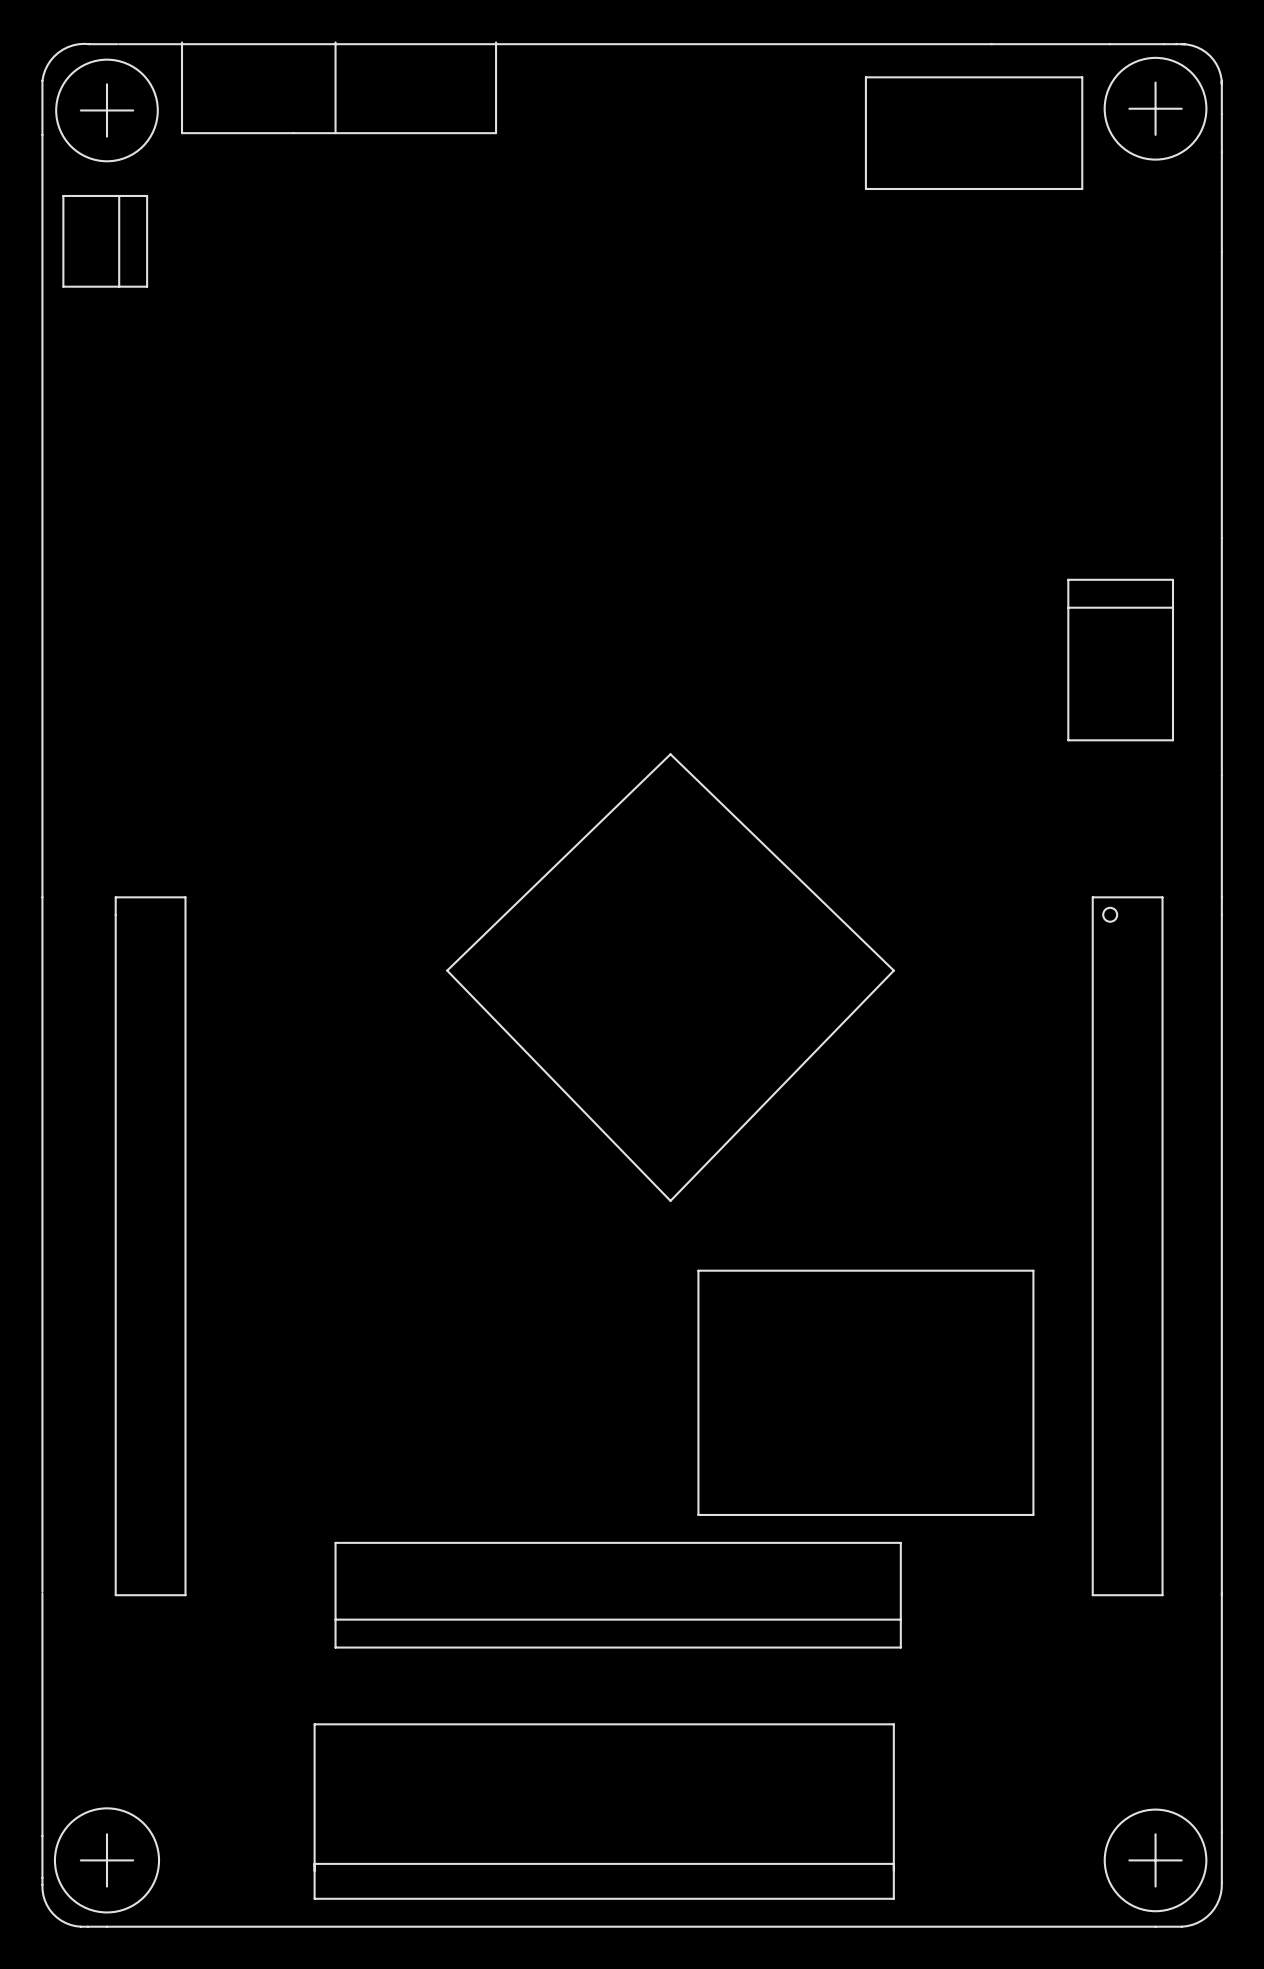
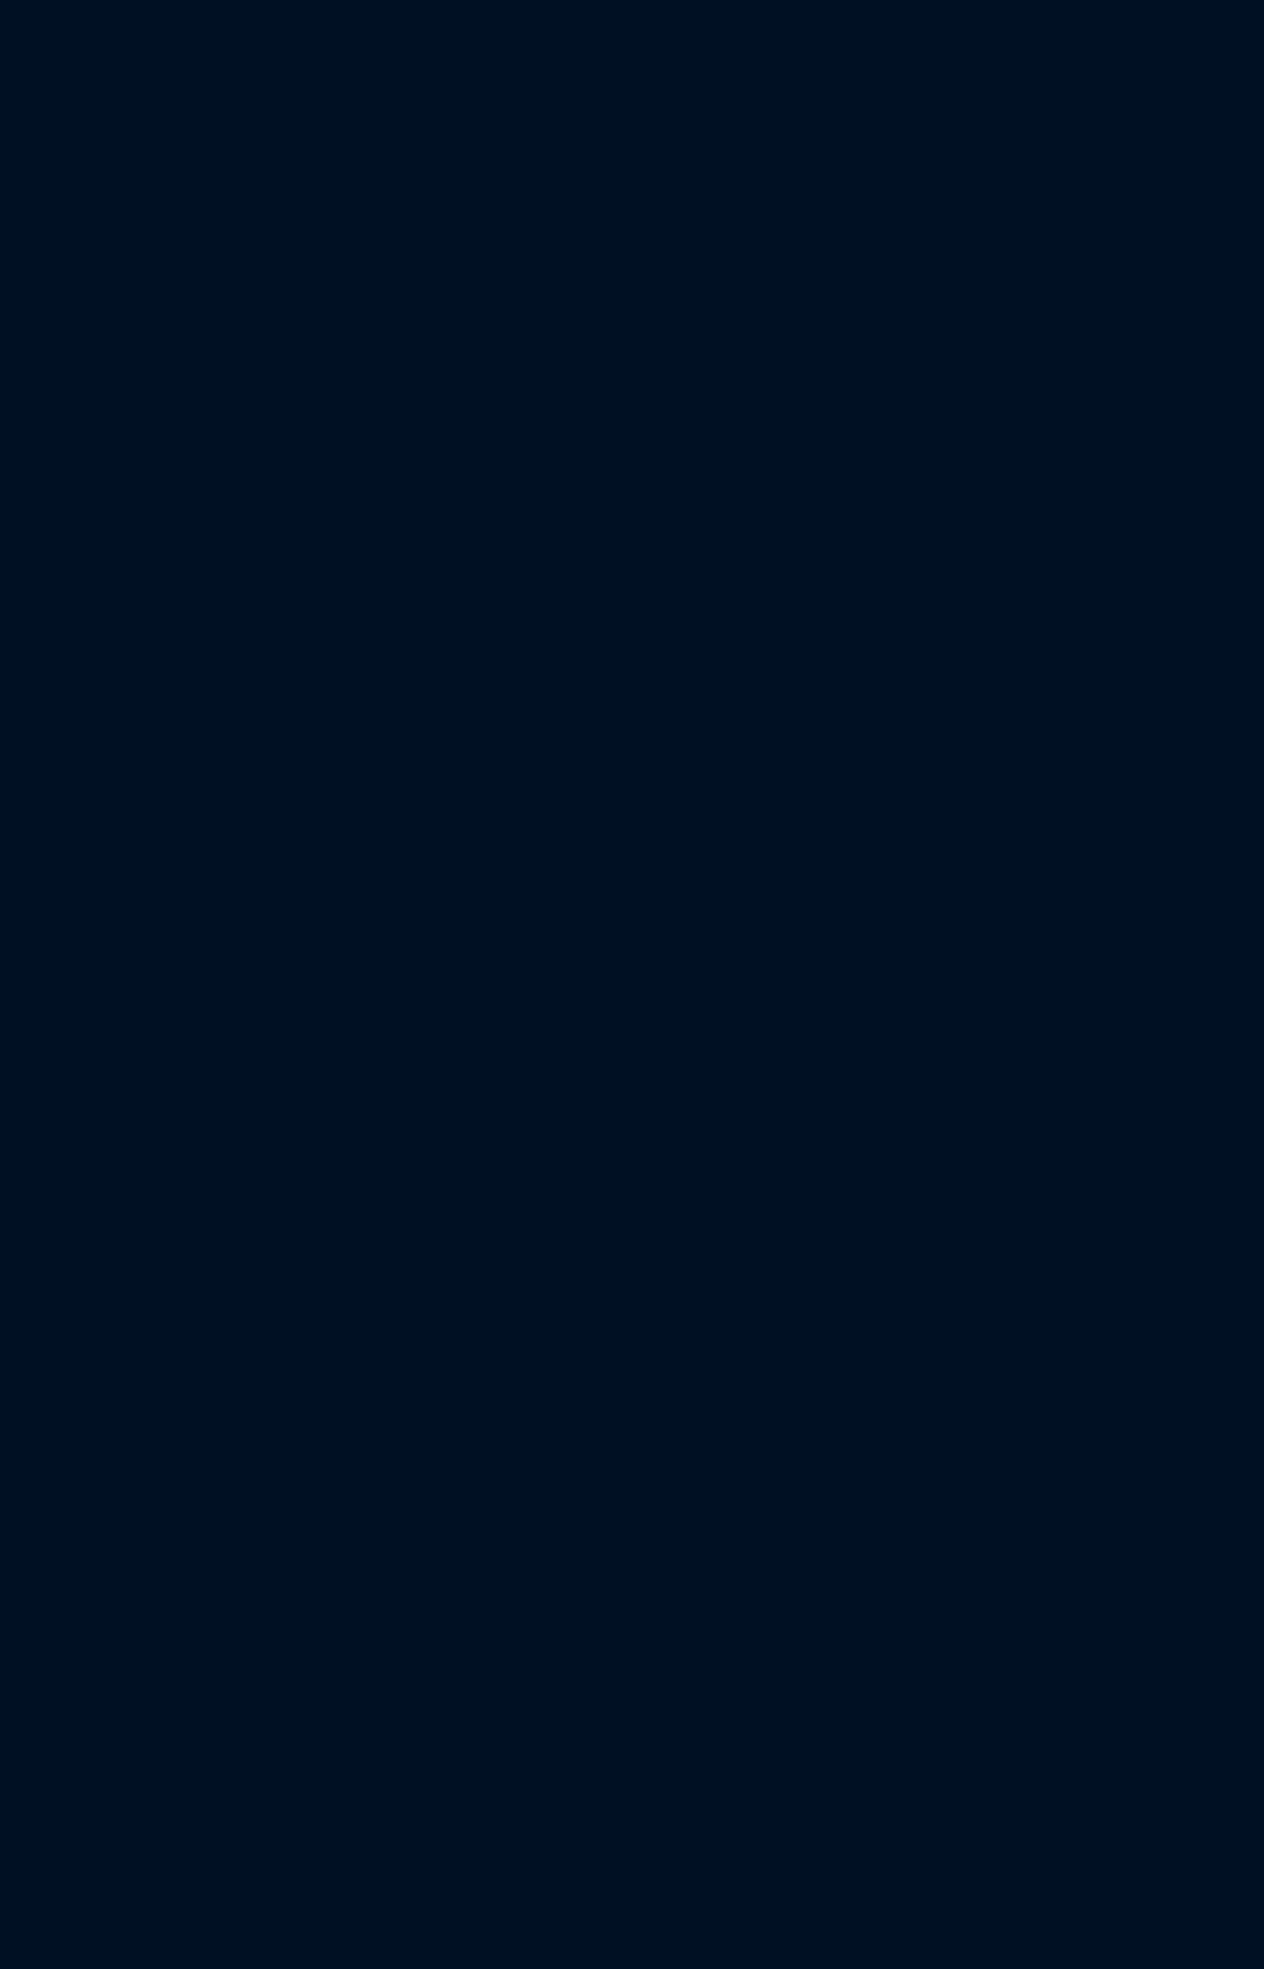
drawing: [41, 41, 1223, 1928] -> none

